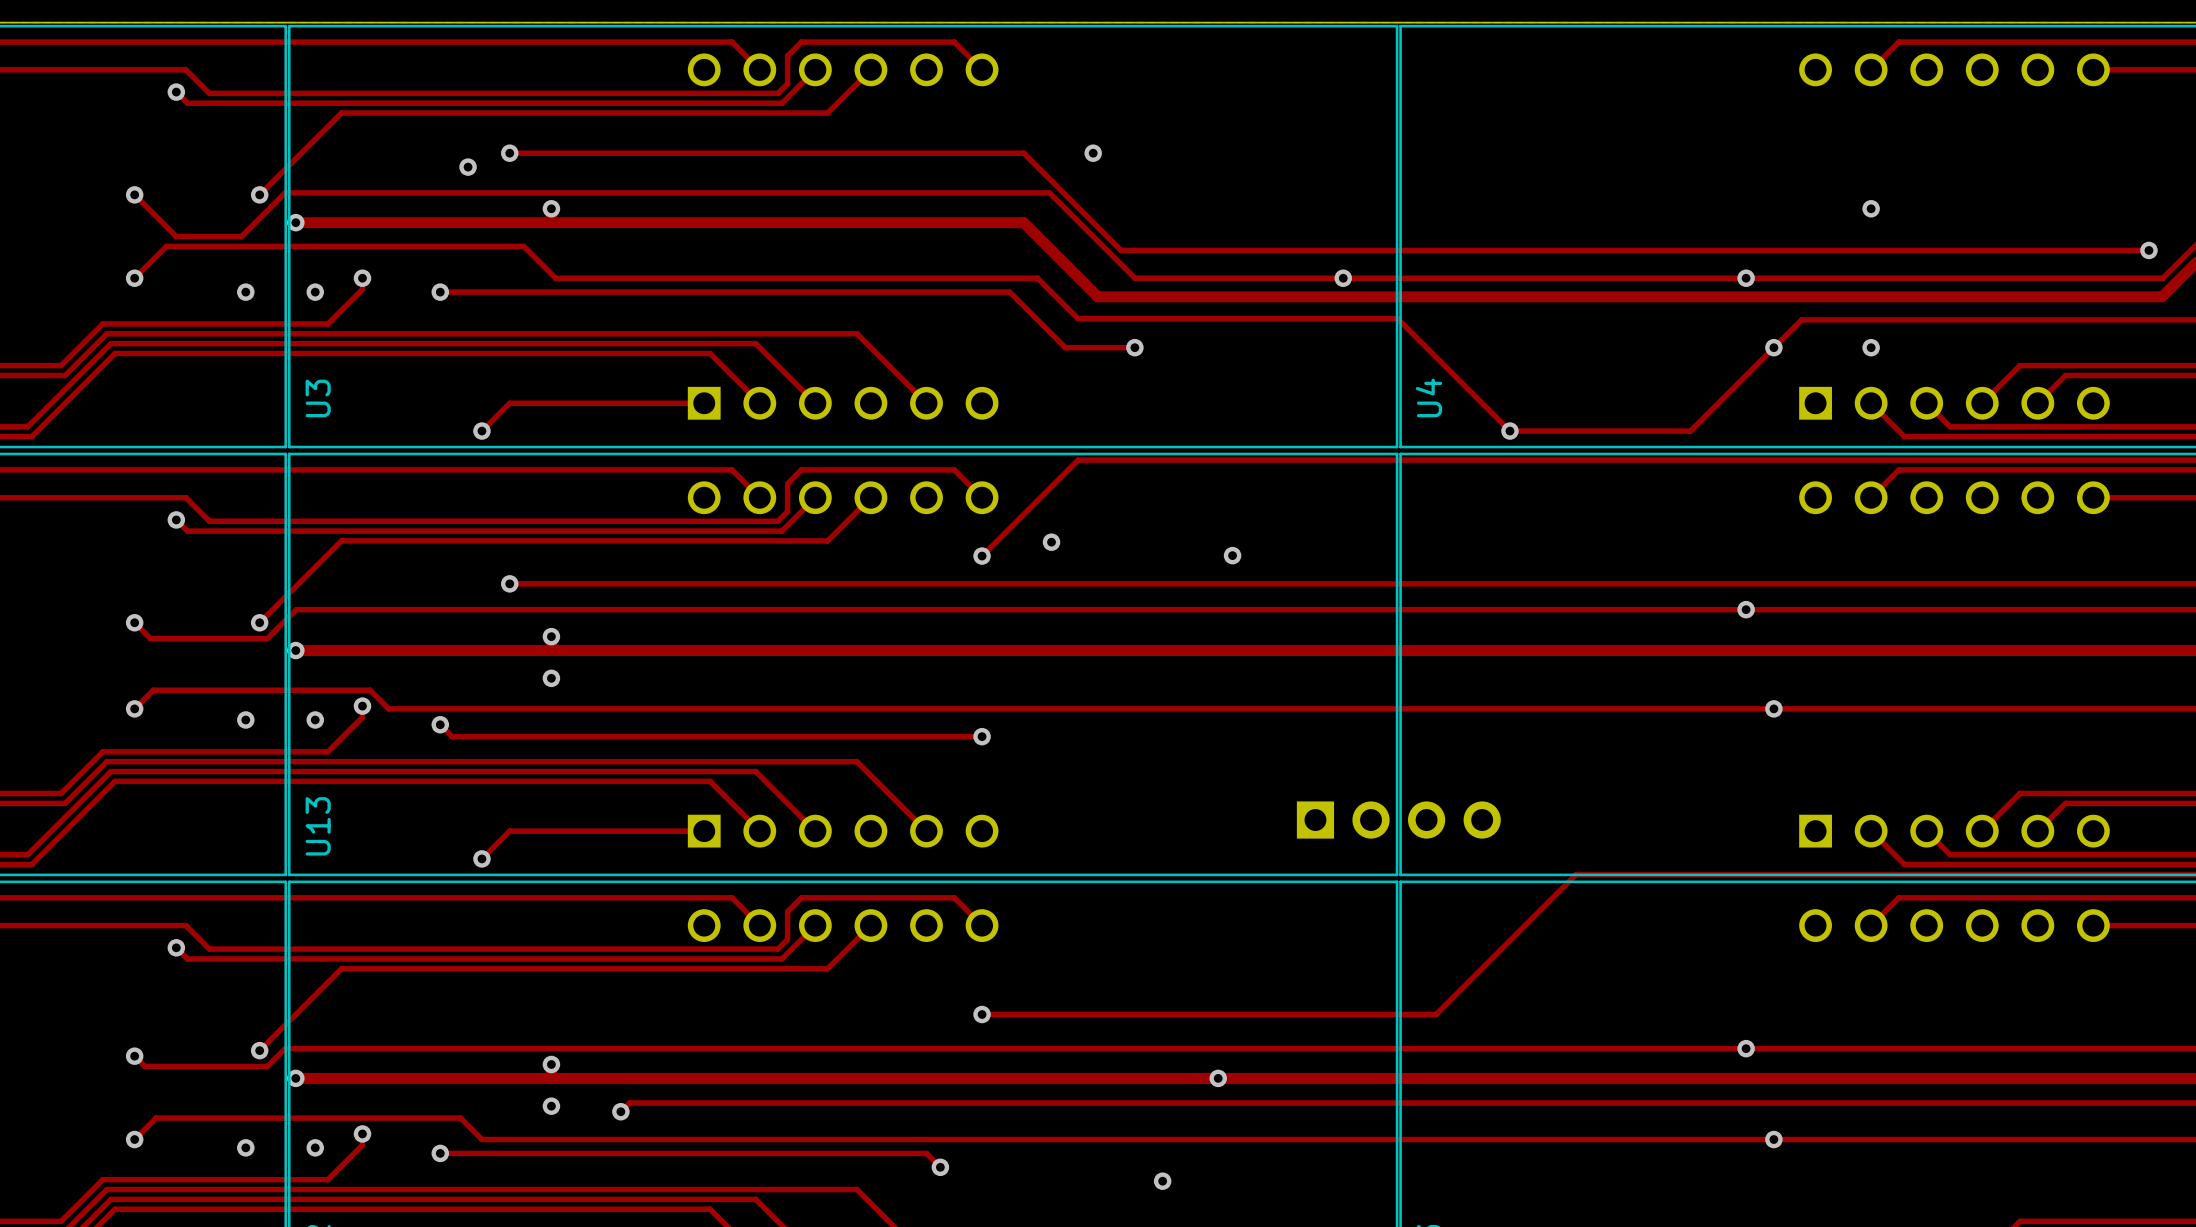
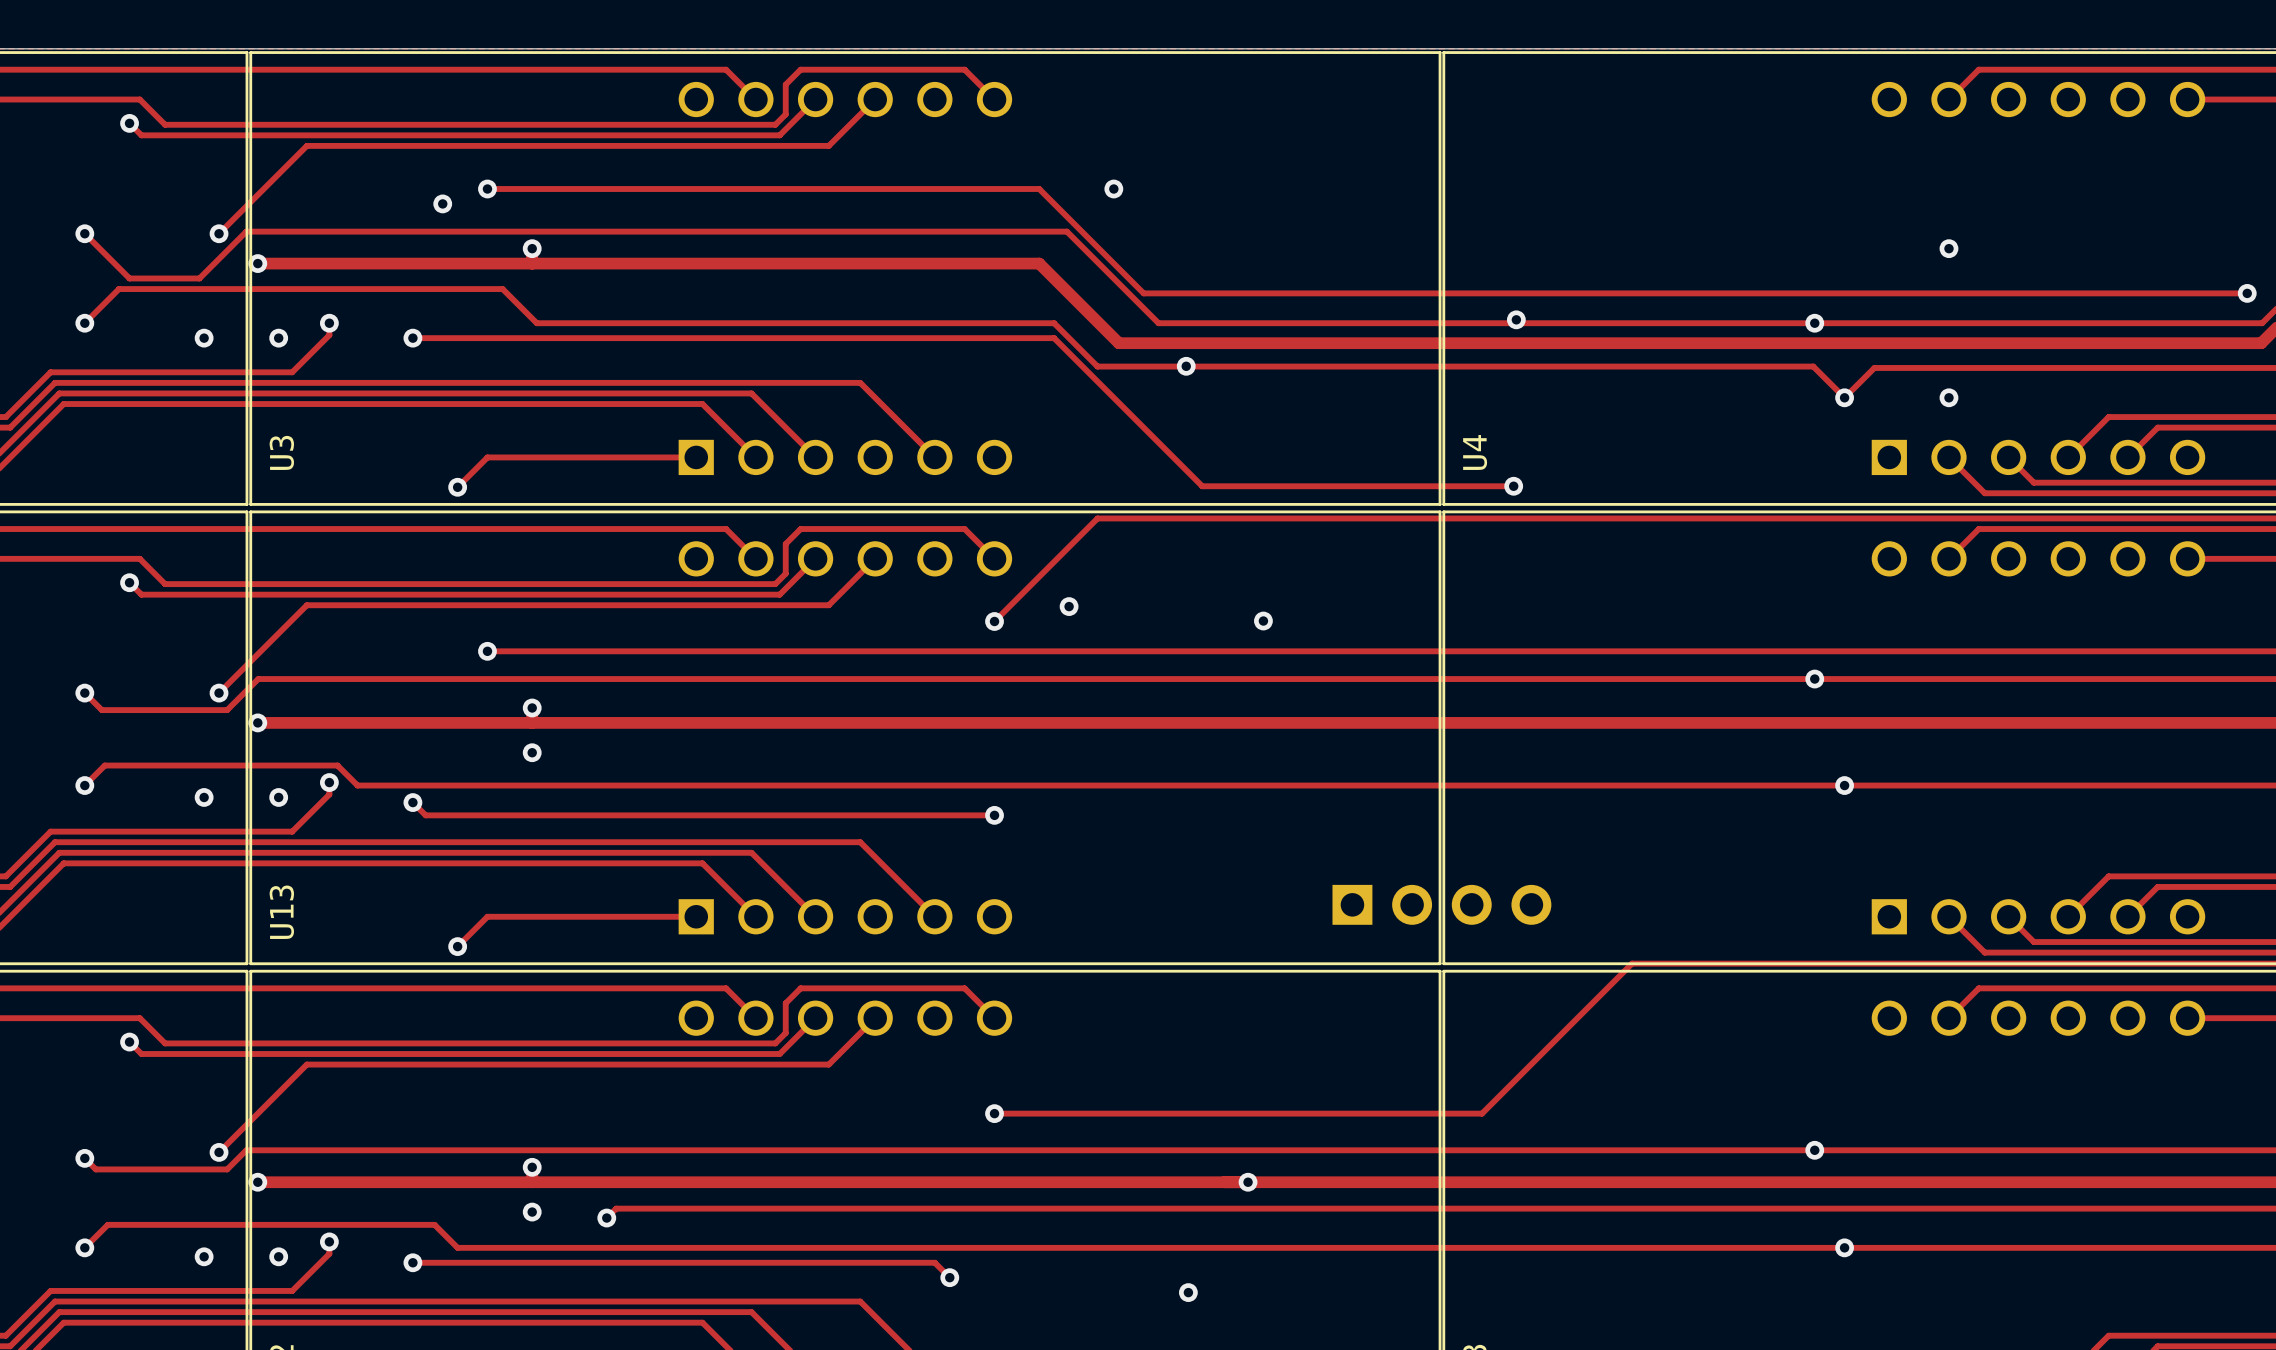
via: none -> (1516, 319)
via: (1343, 278) -> none
track: (1009, 292) (1065, 347) (1134, 347) -> (1024, 338) (1054, 338) (1202, 486) (1513, 486)
track: (1397, 318) (1509, 431) (1690, 431) (1773, 347) -> (1440, 366) (1813, 366) (1844, 397)
via position: (1134, 347) -> (1186, 366)
via position: (1509, 431) -> (1513, 486)

